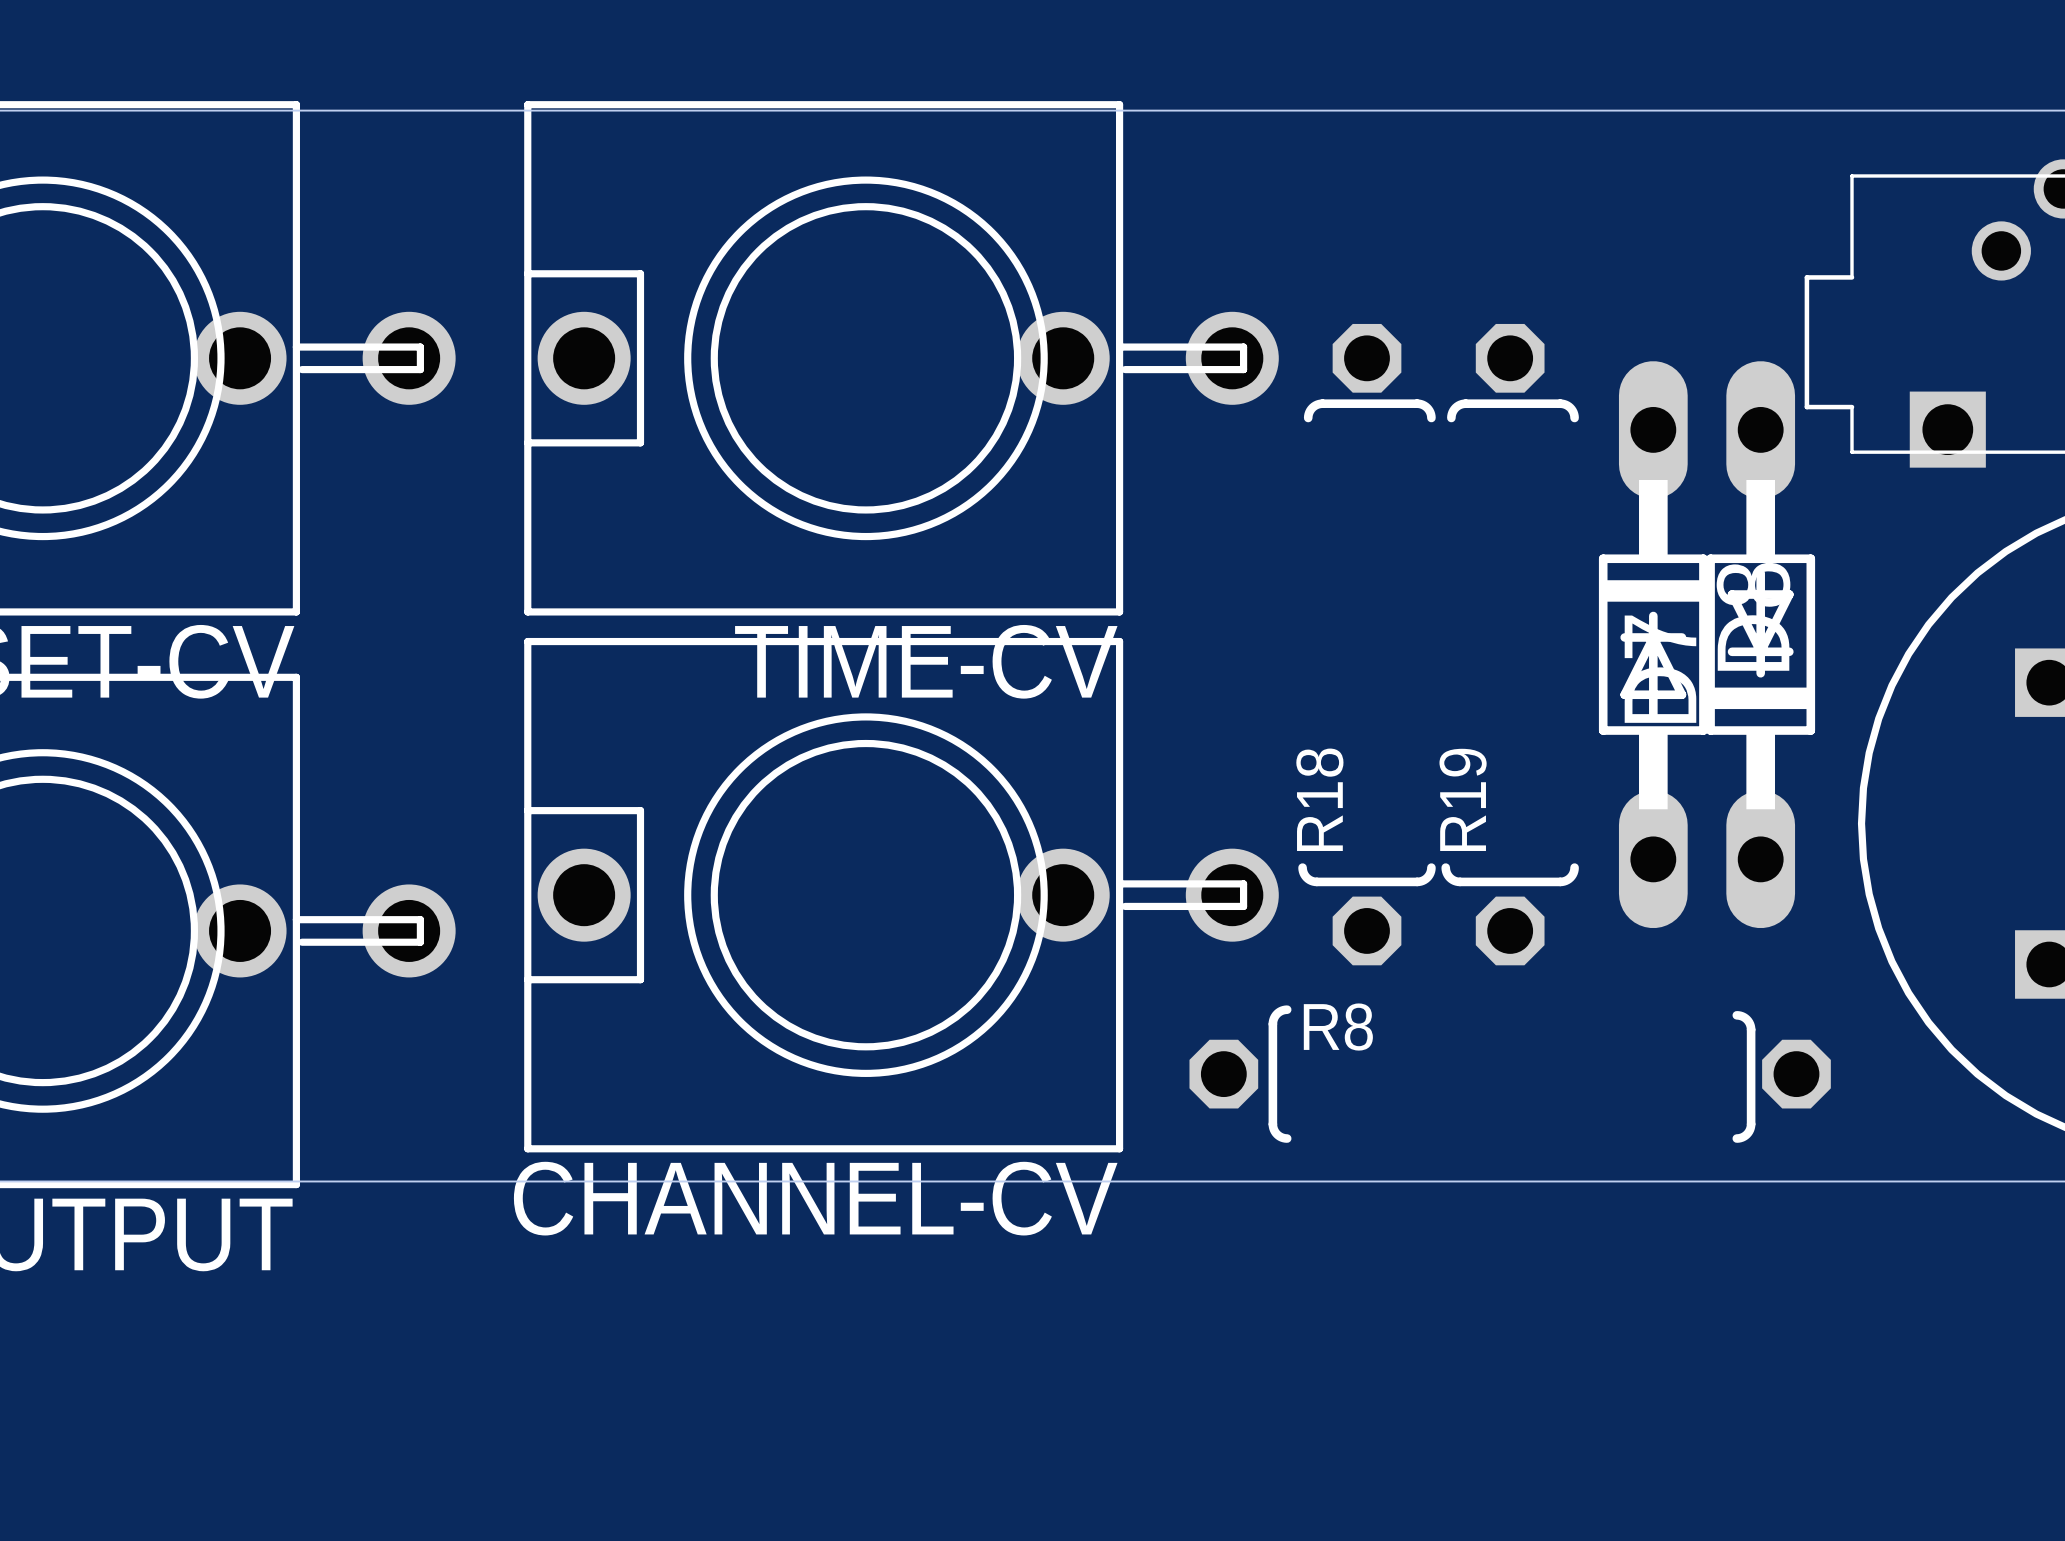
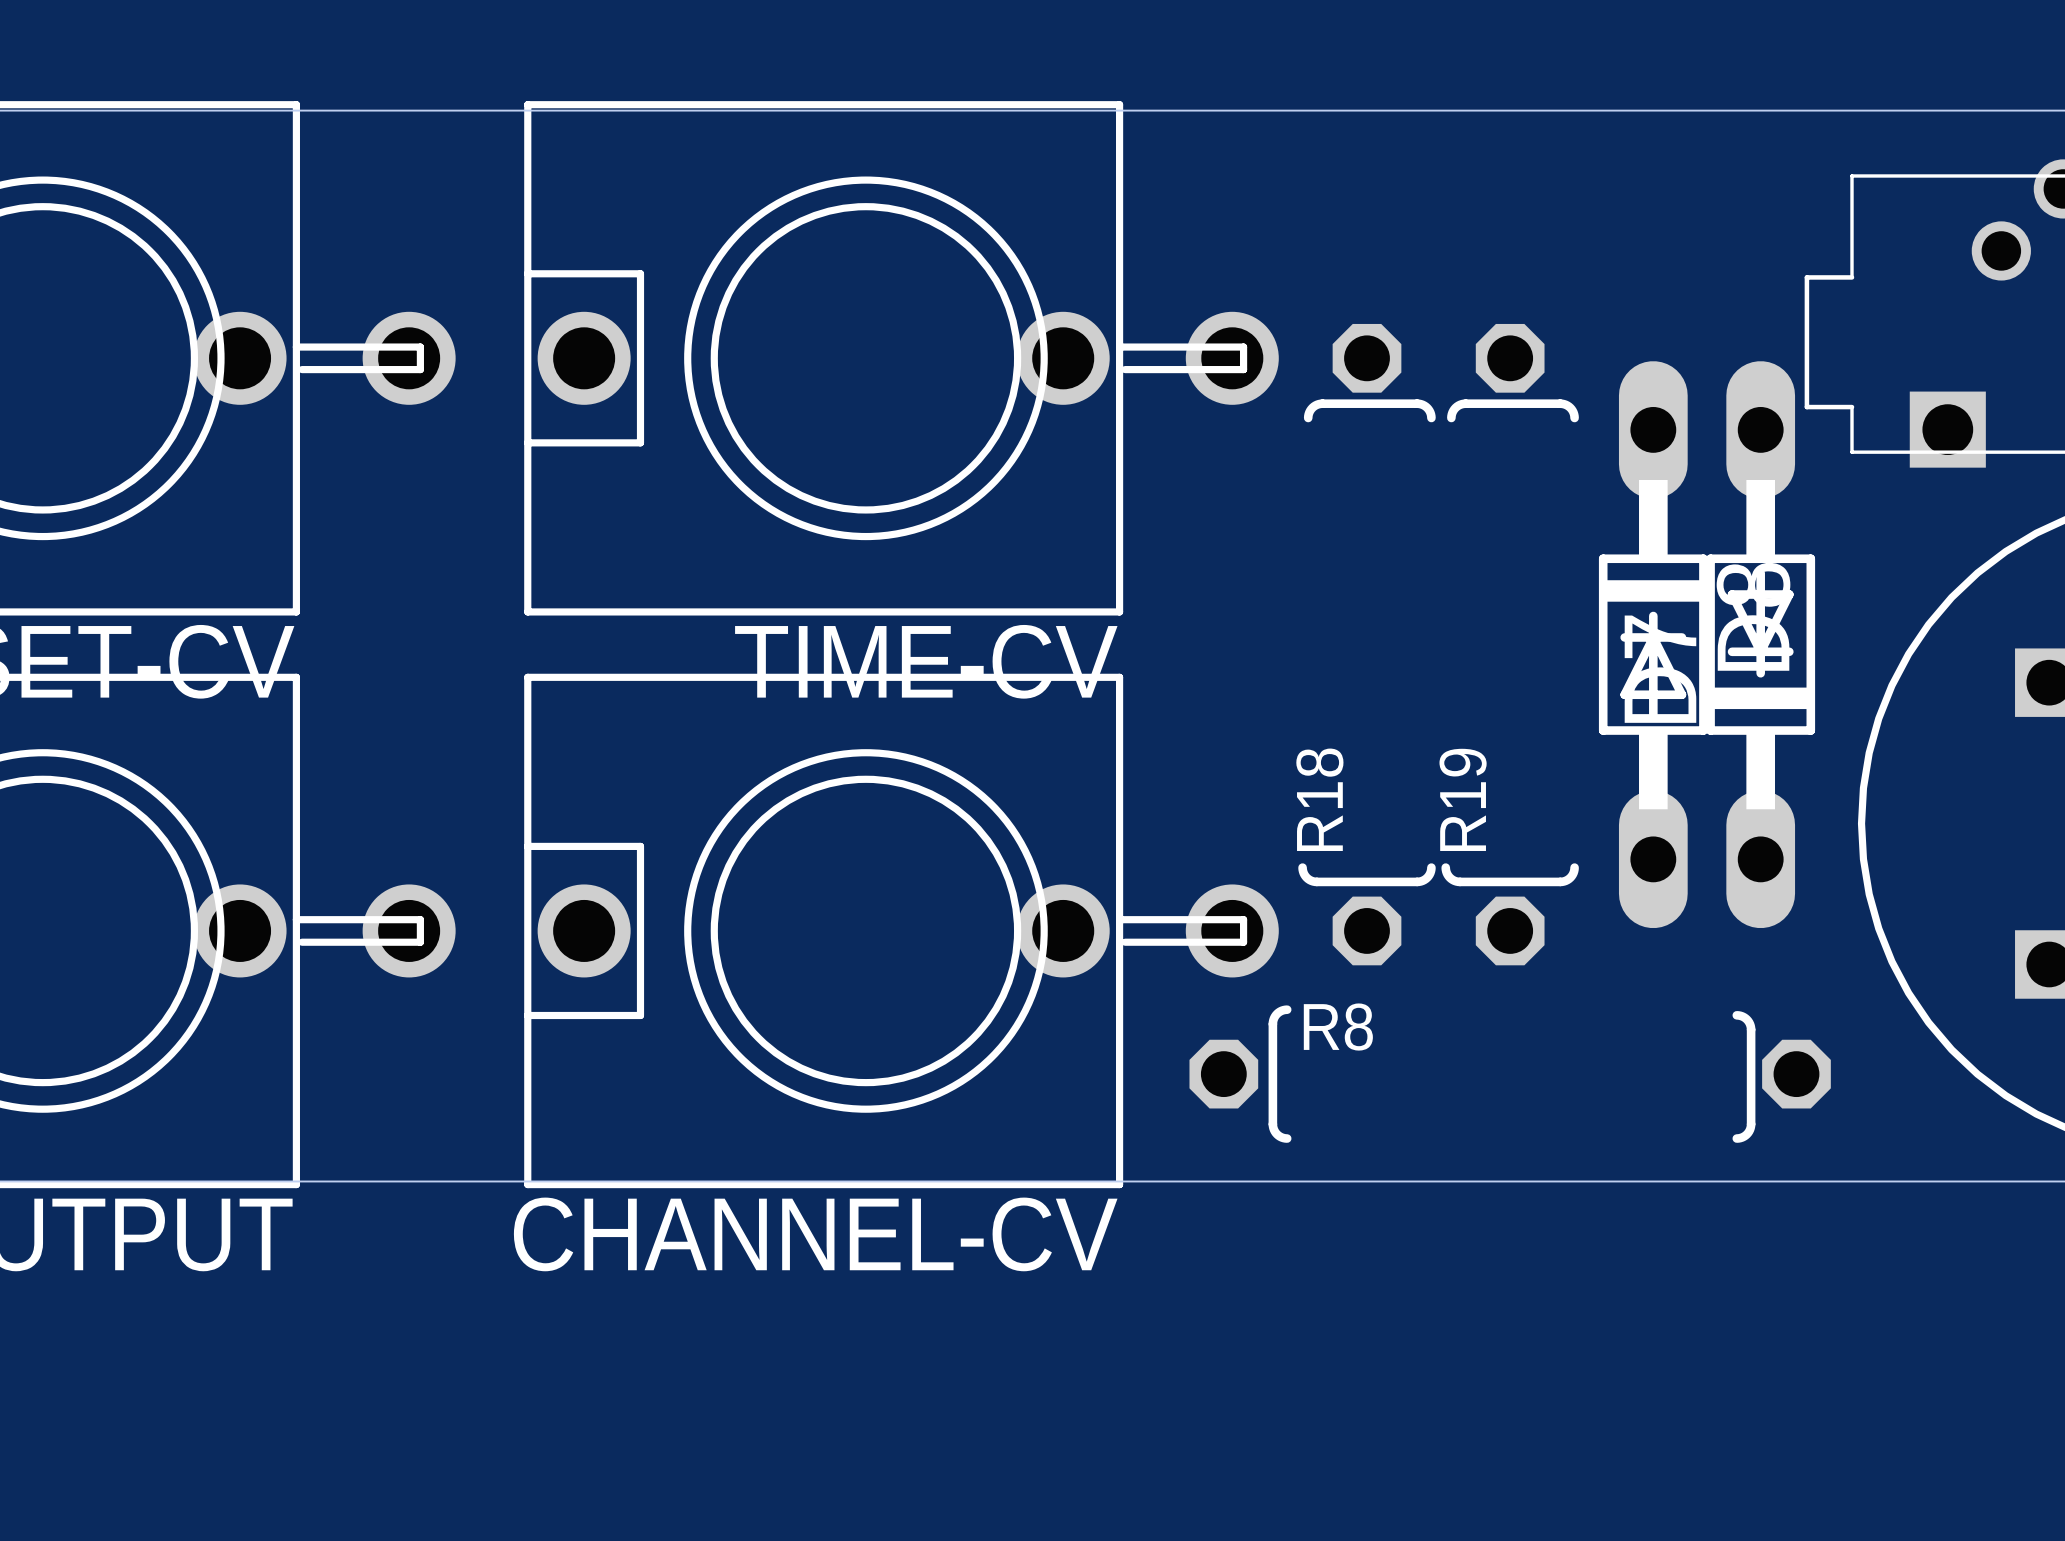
CHANNEL-CV position: (901, 895) -> (901, 930)

